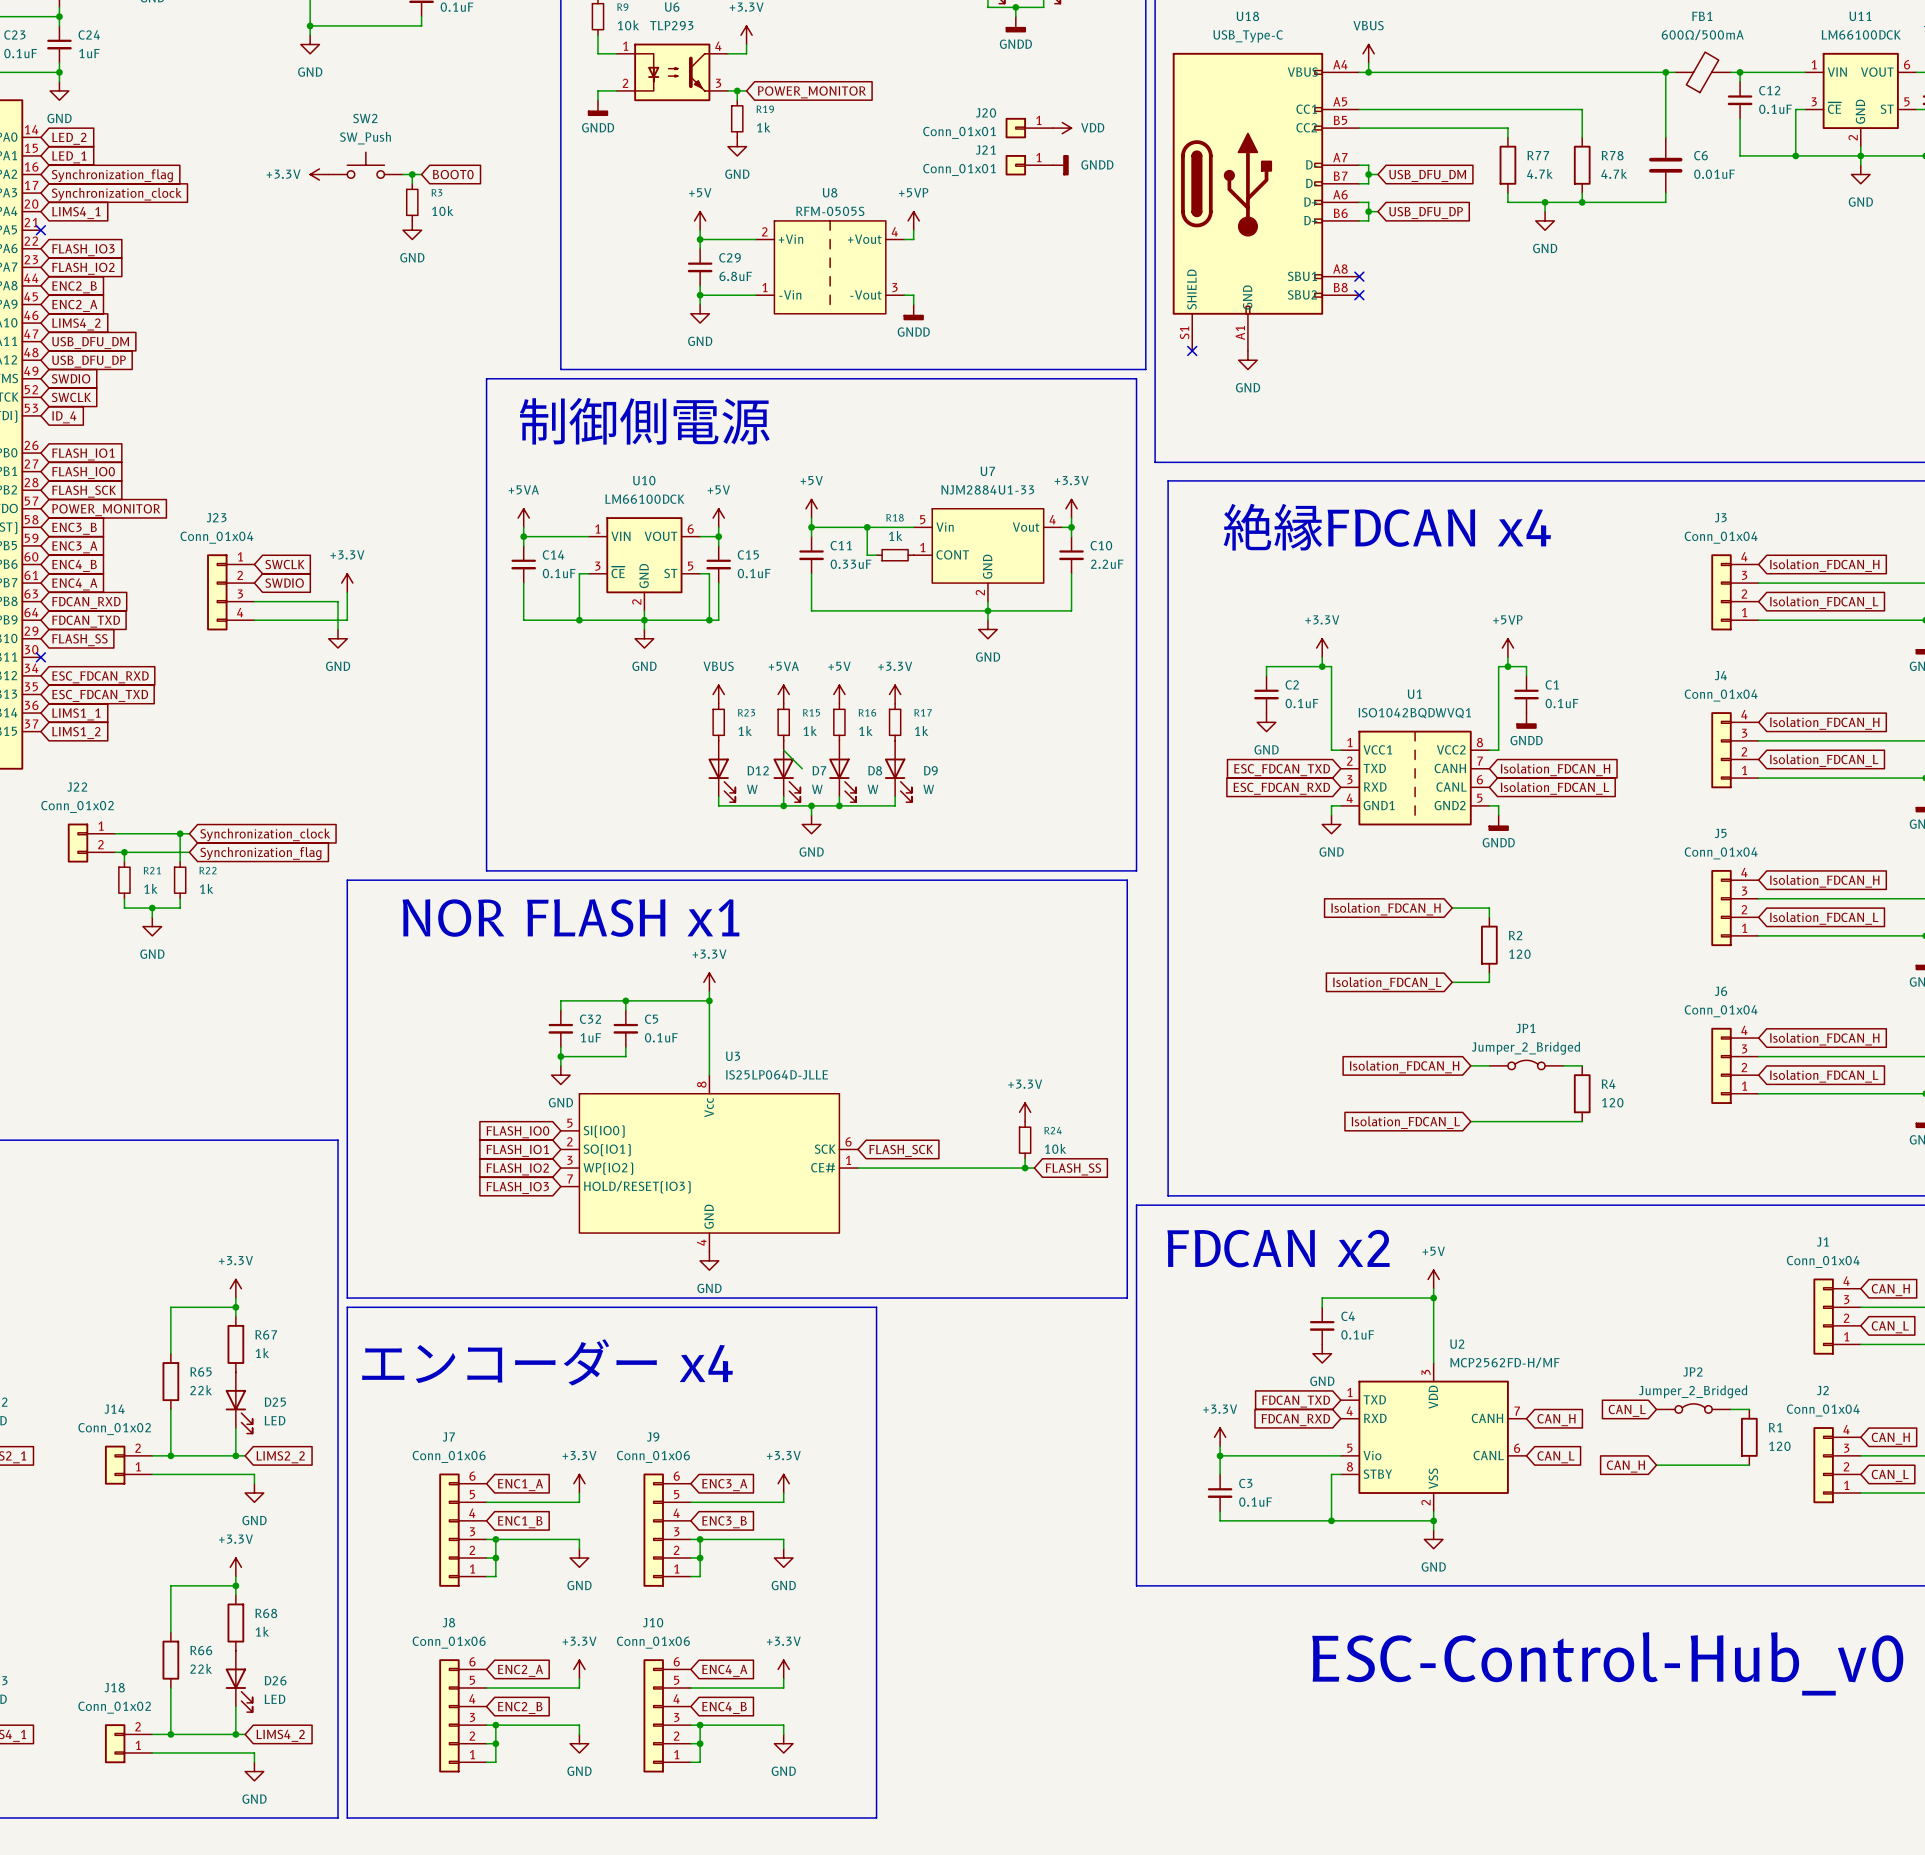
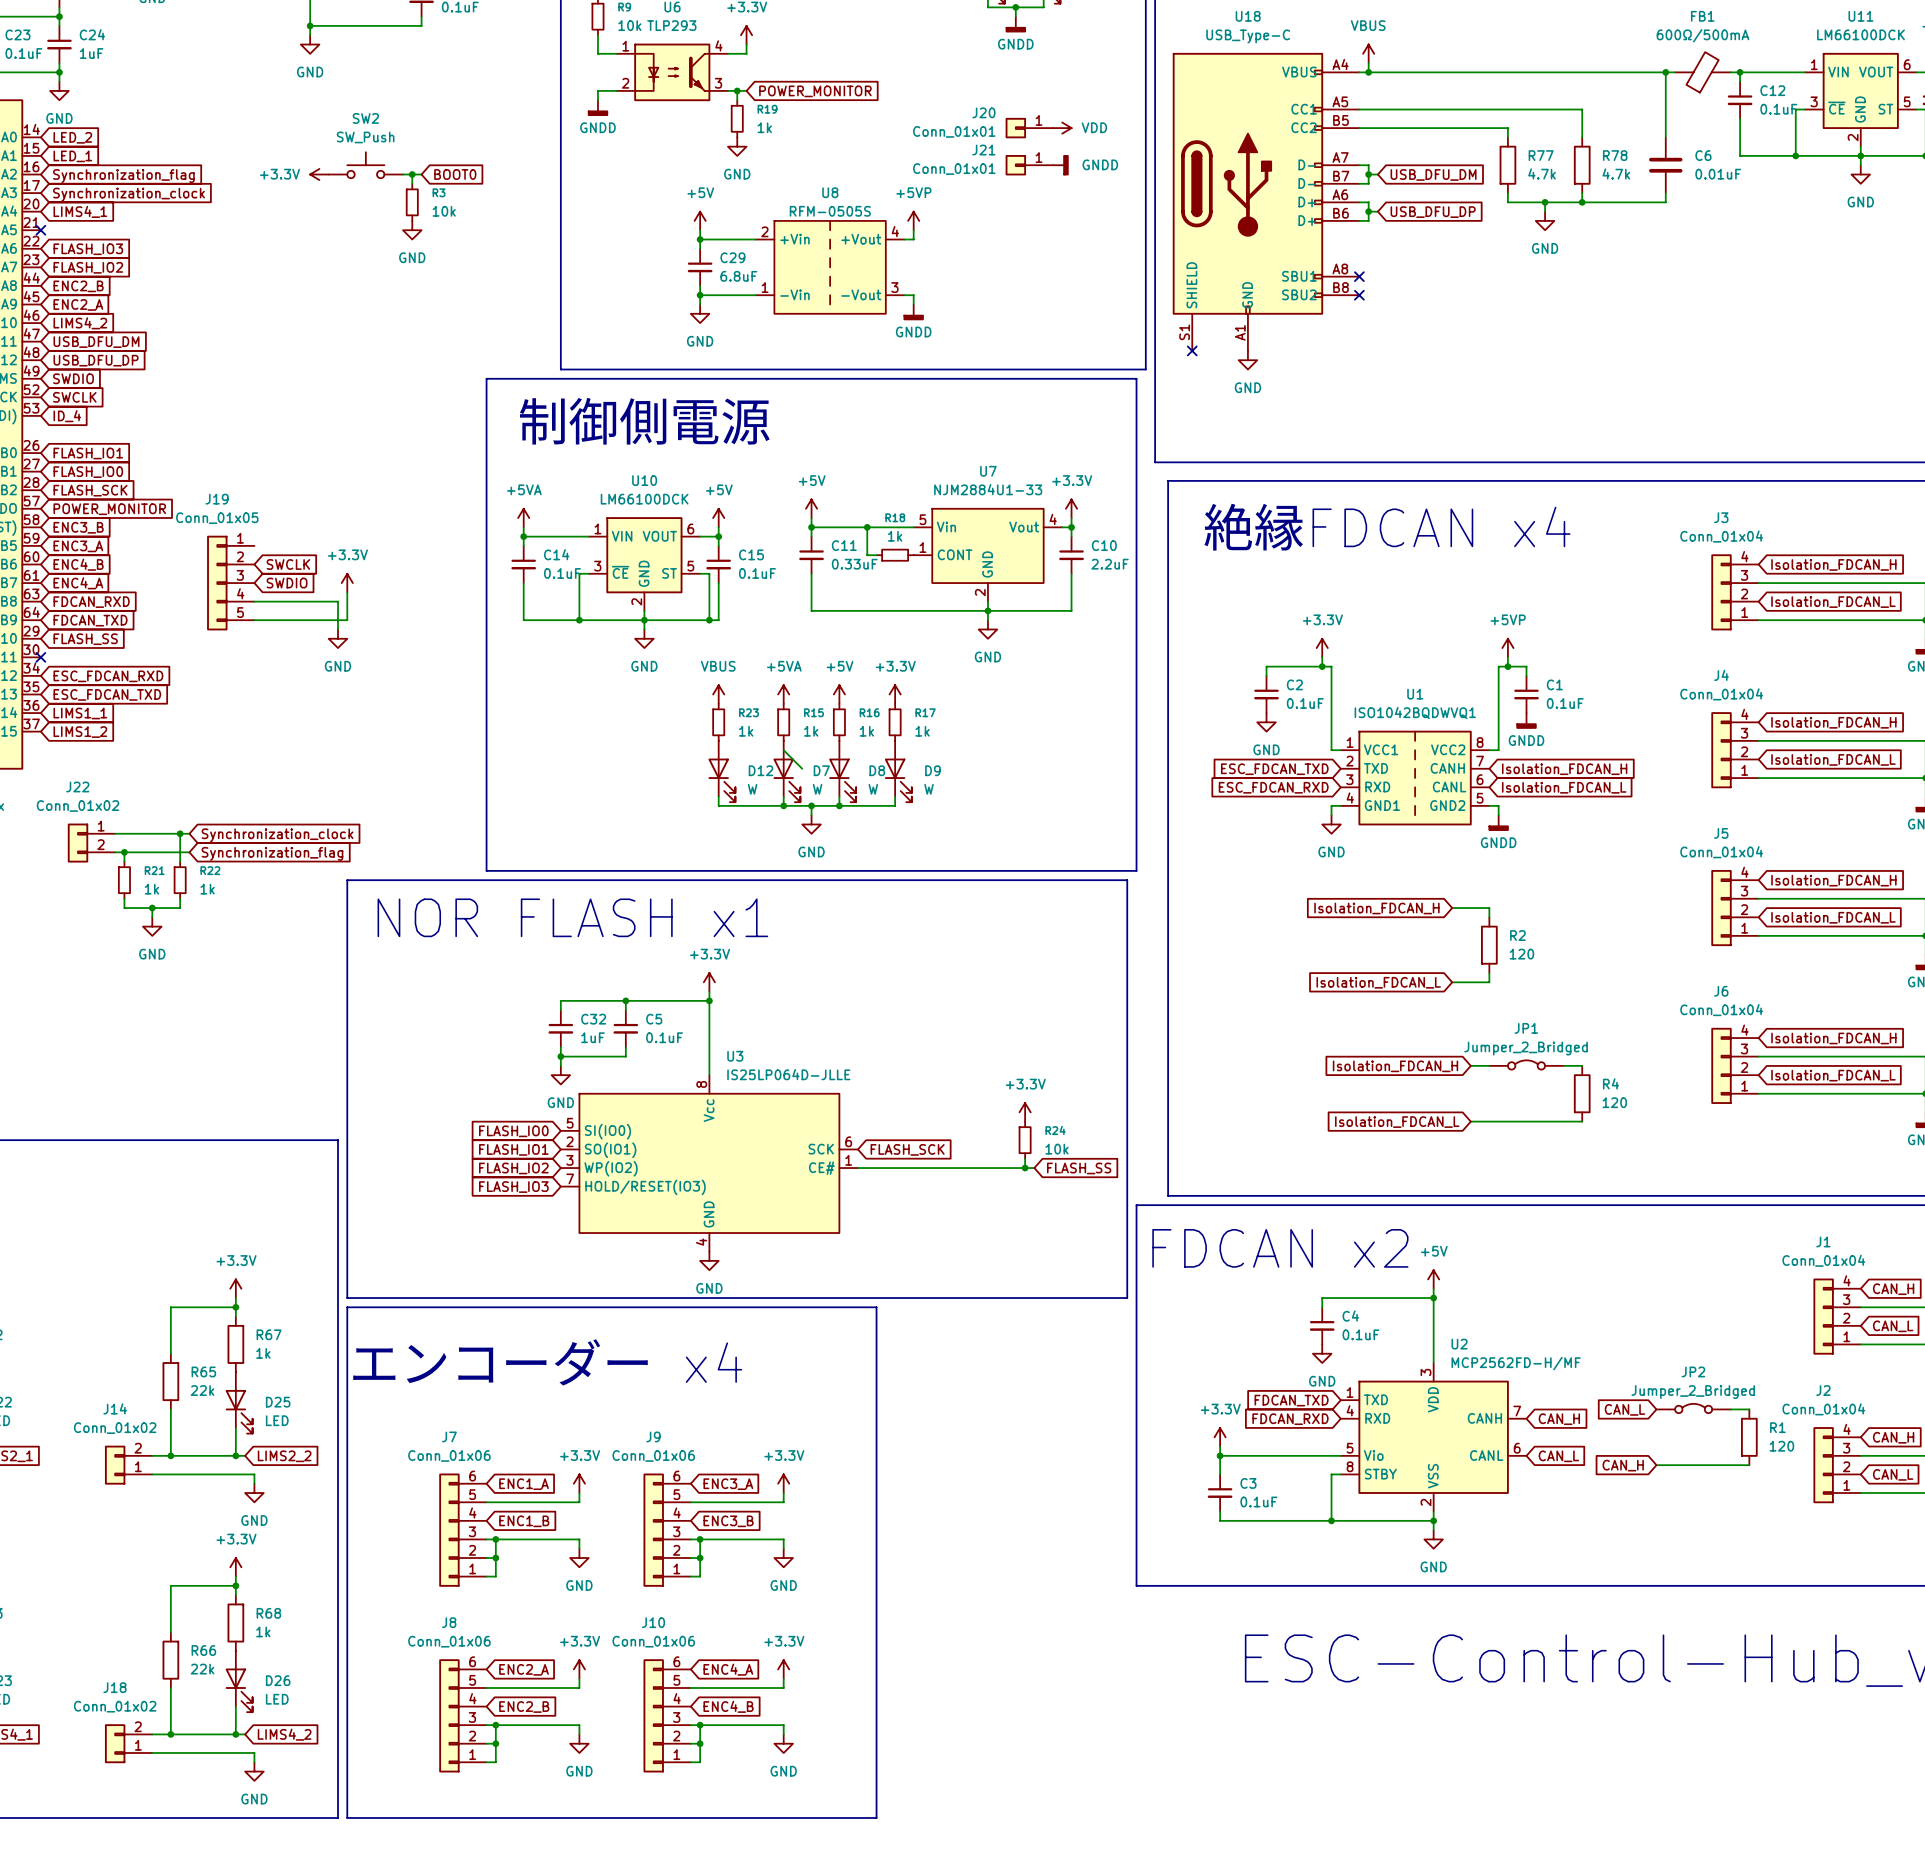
J19: none -> Conn_01x05 (230, 583)
J23: Conn_01x04 (230, 592) -> none

